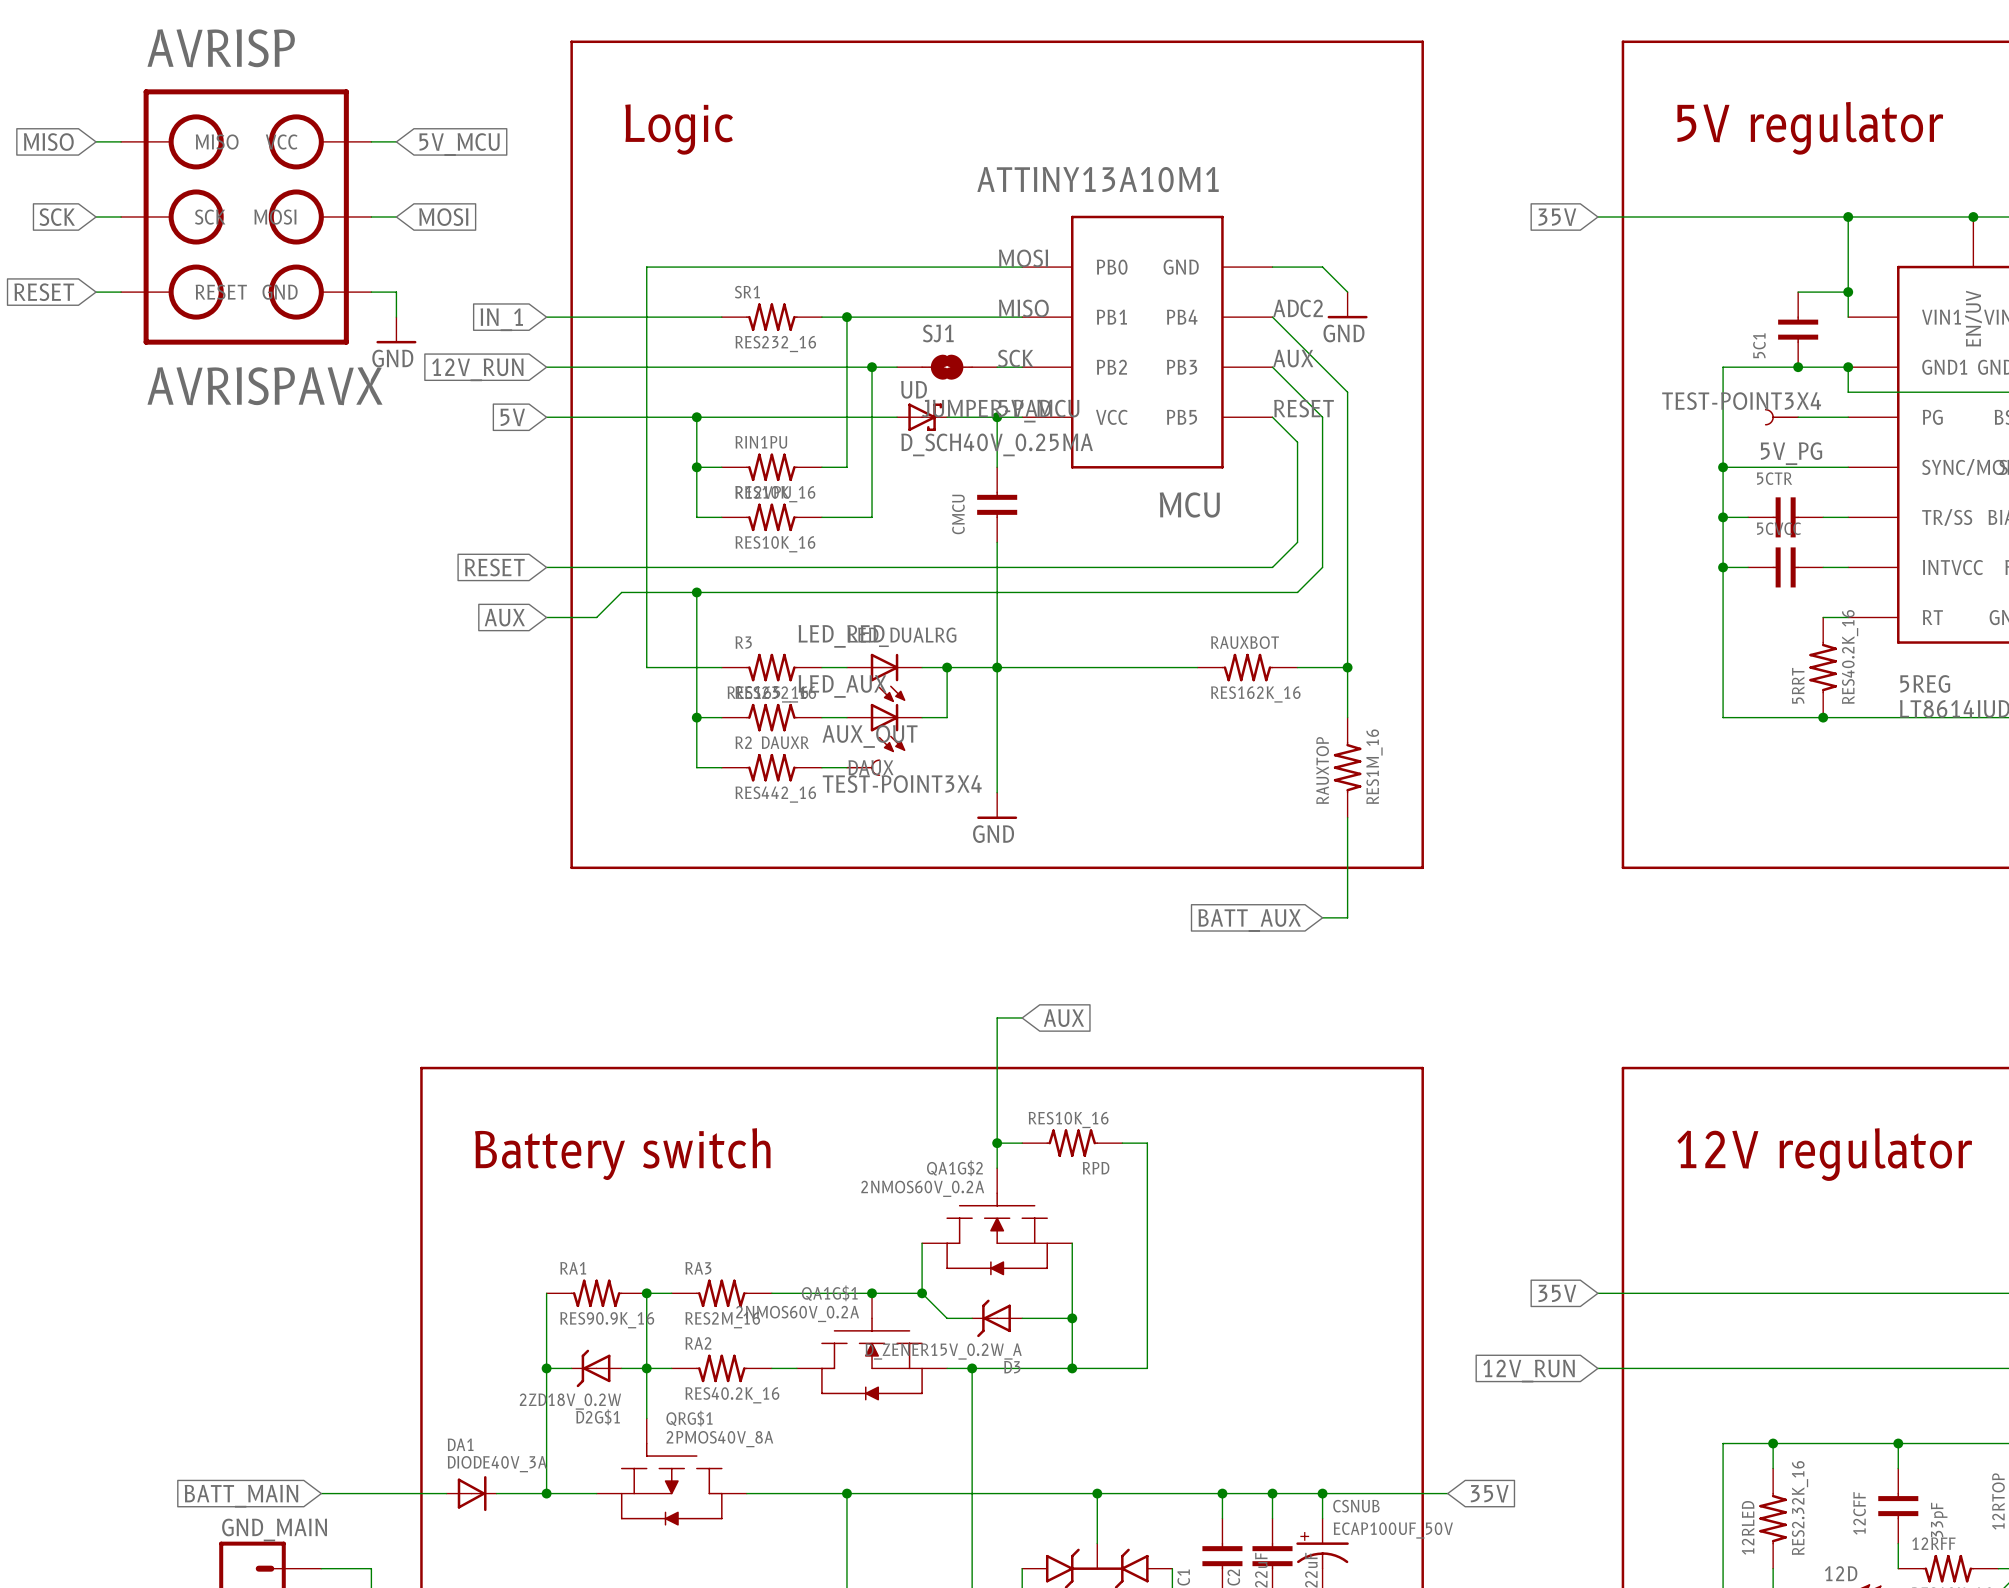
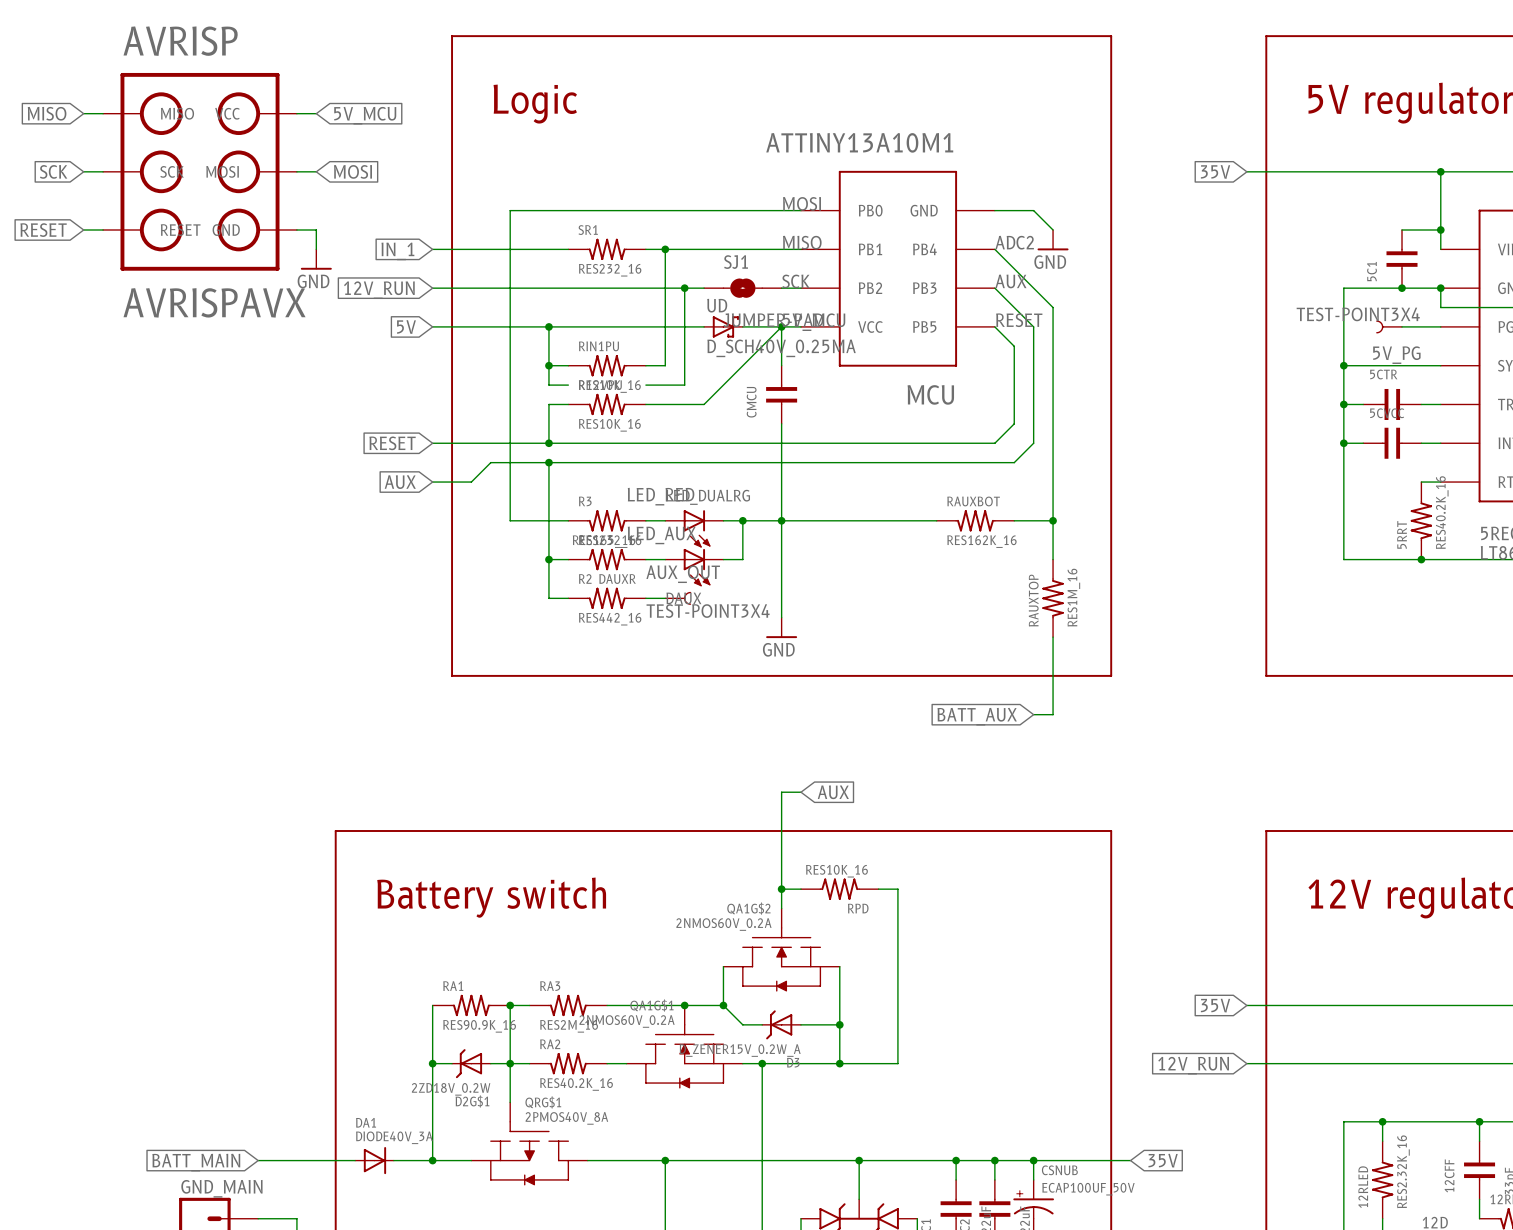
wire: none -> (781, 326) (704, 404) (684, 404)
wire: (696, 492) (696, 517) -> (548, 385) (568, 385)
wire: (872, 492) (872, 517) -> (684, 385) (645, 385)
wire: none -> (548, 404) (548, 443)
junction: none -> (548, 443)

